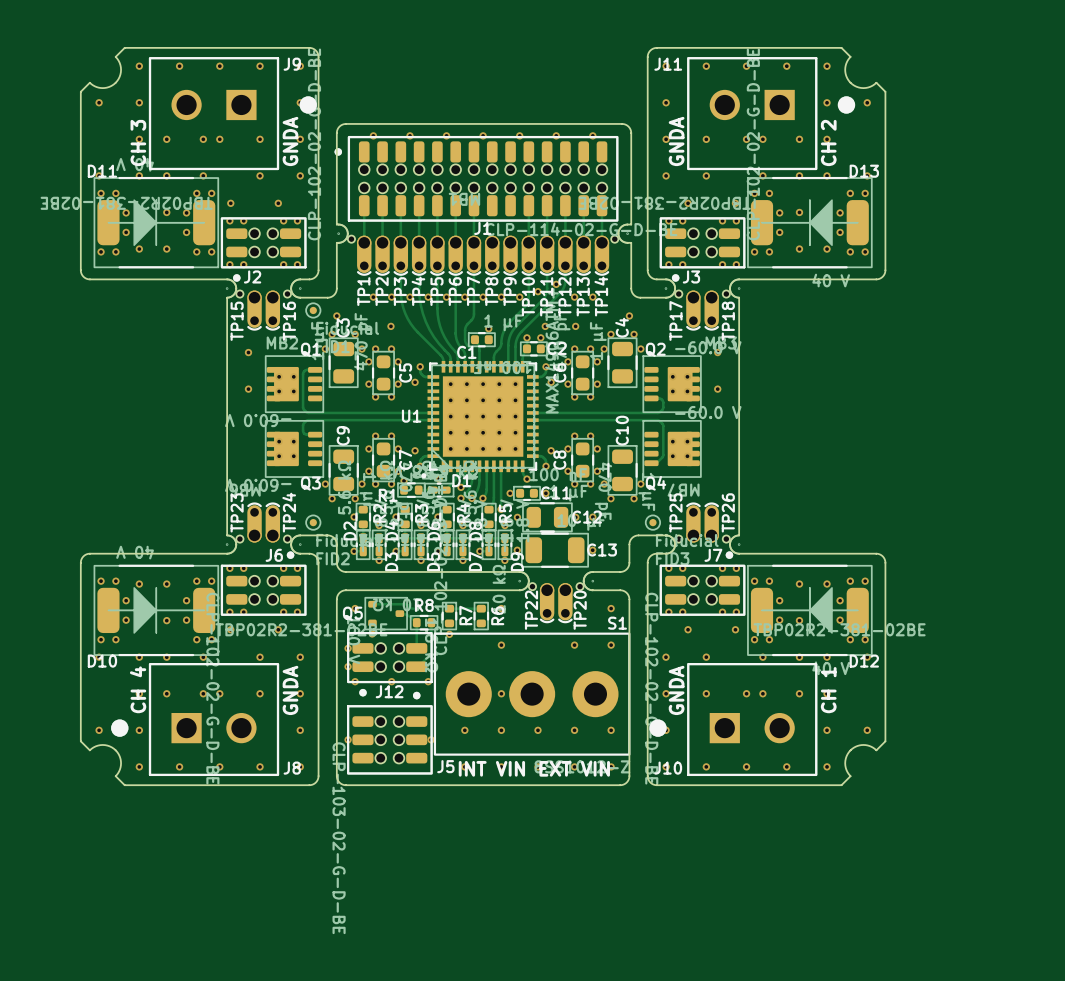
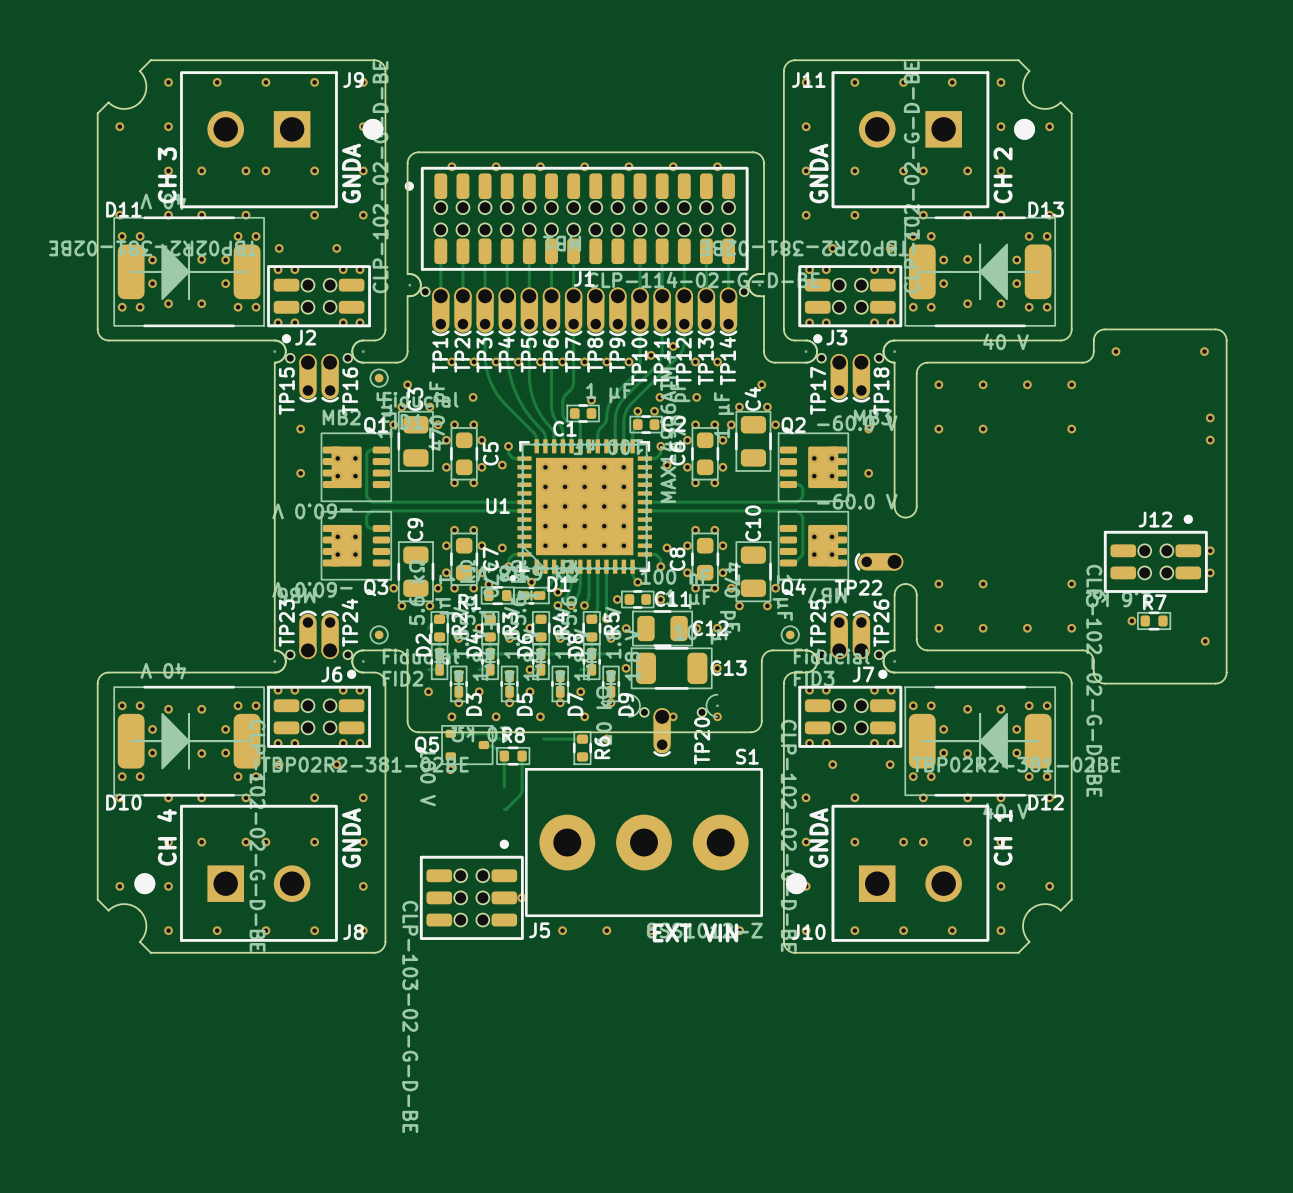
via: none -> (1115, 351)
via: none -> (1204, 351)
via: none -> (938, 384)
via: none -> (983, 384)
via: none -> (1027, 384)
via: none -> (1071, 384)
via: none -> (1210, 417)
via: none -> (938, 429)
via: none -> (983, 429)
via: none -> (1071, 429)
via: none -> (1210, 440)
board edge: (739, 416) (739, 489) -> (894, 506) (897, 514) (904, 517) (912, 515) (916, 508) (916, 373) (918, 367) (922, 363) (1085, 362) (1093, 355) (1095, 334) (1103, 329) (1215, 329) (1221, 331) (1225, 335) (1226, 672) (1222, 681) (1215, 683) (1102, 683) (1094, 676) (1092, 655) (1083, 650) (925, 650) (919, 646) (916, 640) (915, 589) (909, 584) (902, 584) (897, 588) (894, 595)
via: none -> (1210, 550)
via: none -> (1210, 572)
via: none -> (938, 583)
via: none -> (983, 583)
via: none -> (1071, 583)
via: none -> (1131, 621)
via: (354, 517) -> none
via: none -> (938, 628)
via: none -> (983, 628)
via: none -> (1027, 628)
via: none -> (1071, 628)
via: none -> (1205, 641)
D3 position: (379, 544) -> (458, 683)
D5 position: (421, 544) -> (509, 683)
D7 position: (462, 544) -> (560, 683)
D9 position: (504, 544) -> (611, 683)
via: (354, 551) -> none
via: (396, 551) -> none
via: (479, 551) -> none
via: (379, 560) -> none
via: (421, 560) -> none
via: (462, 560) -> none
via: (504, 560) -> none
board edge: (336, 562) (338, 568) (344, 571) (519, 571) (526, 574) (528, 581) (526, 587) (520, 590) (345, 590) (339, 592) (336, 599) (336, 776) (339, 782) (345, 785) (620, 785) (625, 783) (629, 776) (629, 597) (622, 590) (589, 589) (585, 586) (583, 581) (585, 575) (590, 572) (623, 571) (627, 568) (629, 562) -> (407, 683) (407, 723) (411, 729) (418, 732) (751, 732) (758, 729) (761, 723) (761, 683)
via: none -> (428, 691)
via: none -> (479, 691)
via: none -> (529, 691)
via: none -> (580, 691)
via: none -> (458, 702)
via: none -> (509, 702)
via: none -> (560, 702)
via: none -> (611, 702)
via: none -> (451, 716)
via: none -> (496, 716)
via: none -> (540, 716)
via: none -> (584, 716)
via: none -> (673, 716)
TP22 rotation: 0° (565, 603) -> 90° clockwise (878, 561)
TP22 position: (565, 603) -> (878, 561)
via: (355, 608) -> none
via position: (611, 608) -> (717, 716)
R7 rotation: 0° (449, 616) -> 90° clockwise (1154, 621)
R7 position: (449, 616) -> (1154, 621)
via: (449, 634) -> none
via: (501, 645) -> none
via: (574, 645) -> none
via: (611, 645) -> none
via: (348, 648) -> none
J12 rotation: 0° (389, 664) -> 180° (1155, 553)
J12 position: (389, 664) -> (1155, 553)
via: (348, 666) -> none
via: (355, 681) -> none
via: (391, 681) -> none
via: (428, 681) -> none
via: (501, 693) -> none
via: (464, 730) -> none
via: (501, 730) -> none
via: (537, 730) -> none
via: (574, 730) -> none
via: (611, 730) -> none
via: (348, 739) -> none
via: (574, 766) -> none
text: INT VIN (491, 768) -> none

